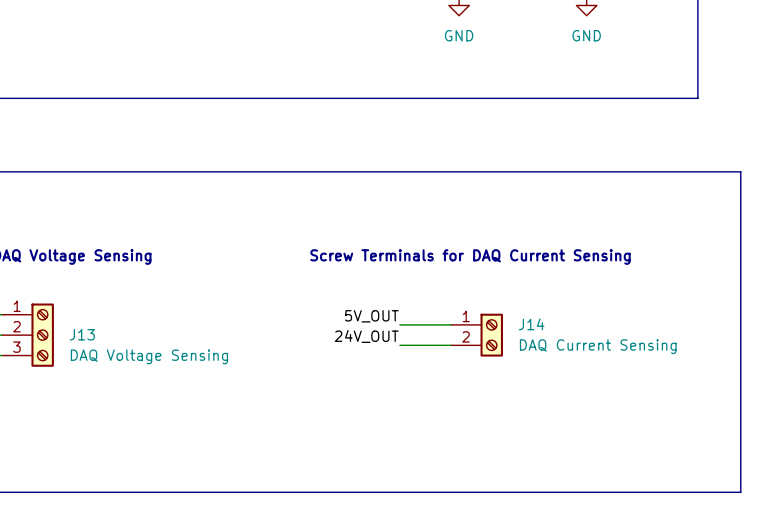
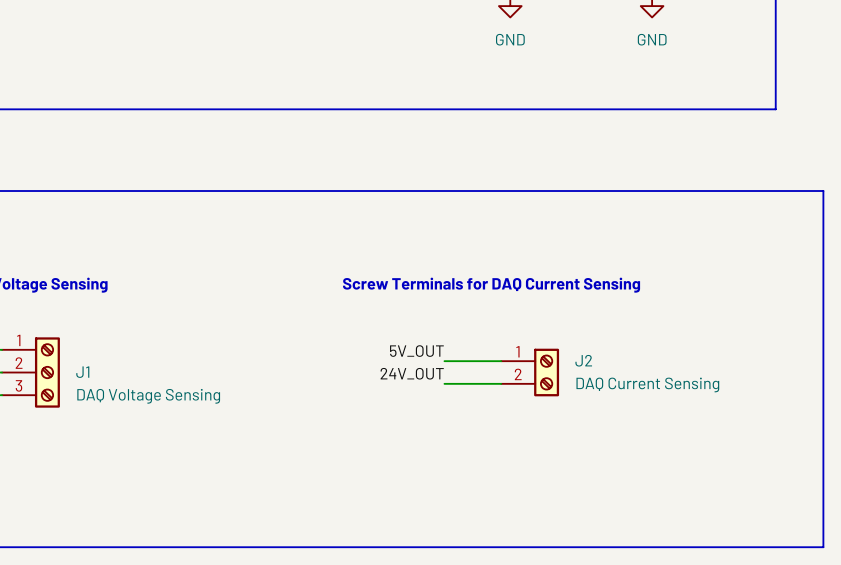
J14 name: J14 (531, 324) -> J2 (583, 360)
J13 name: J13 (82, 334) -> J1 (82, 372)

